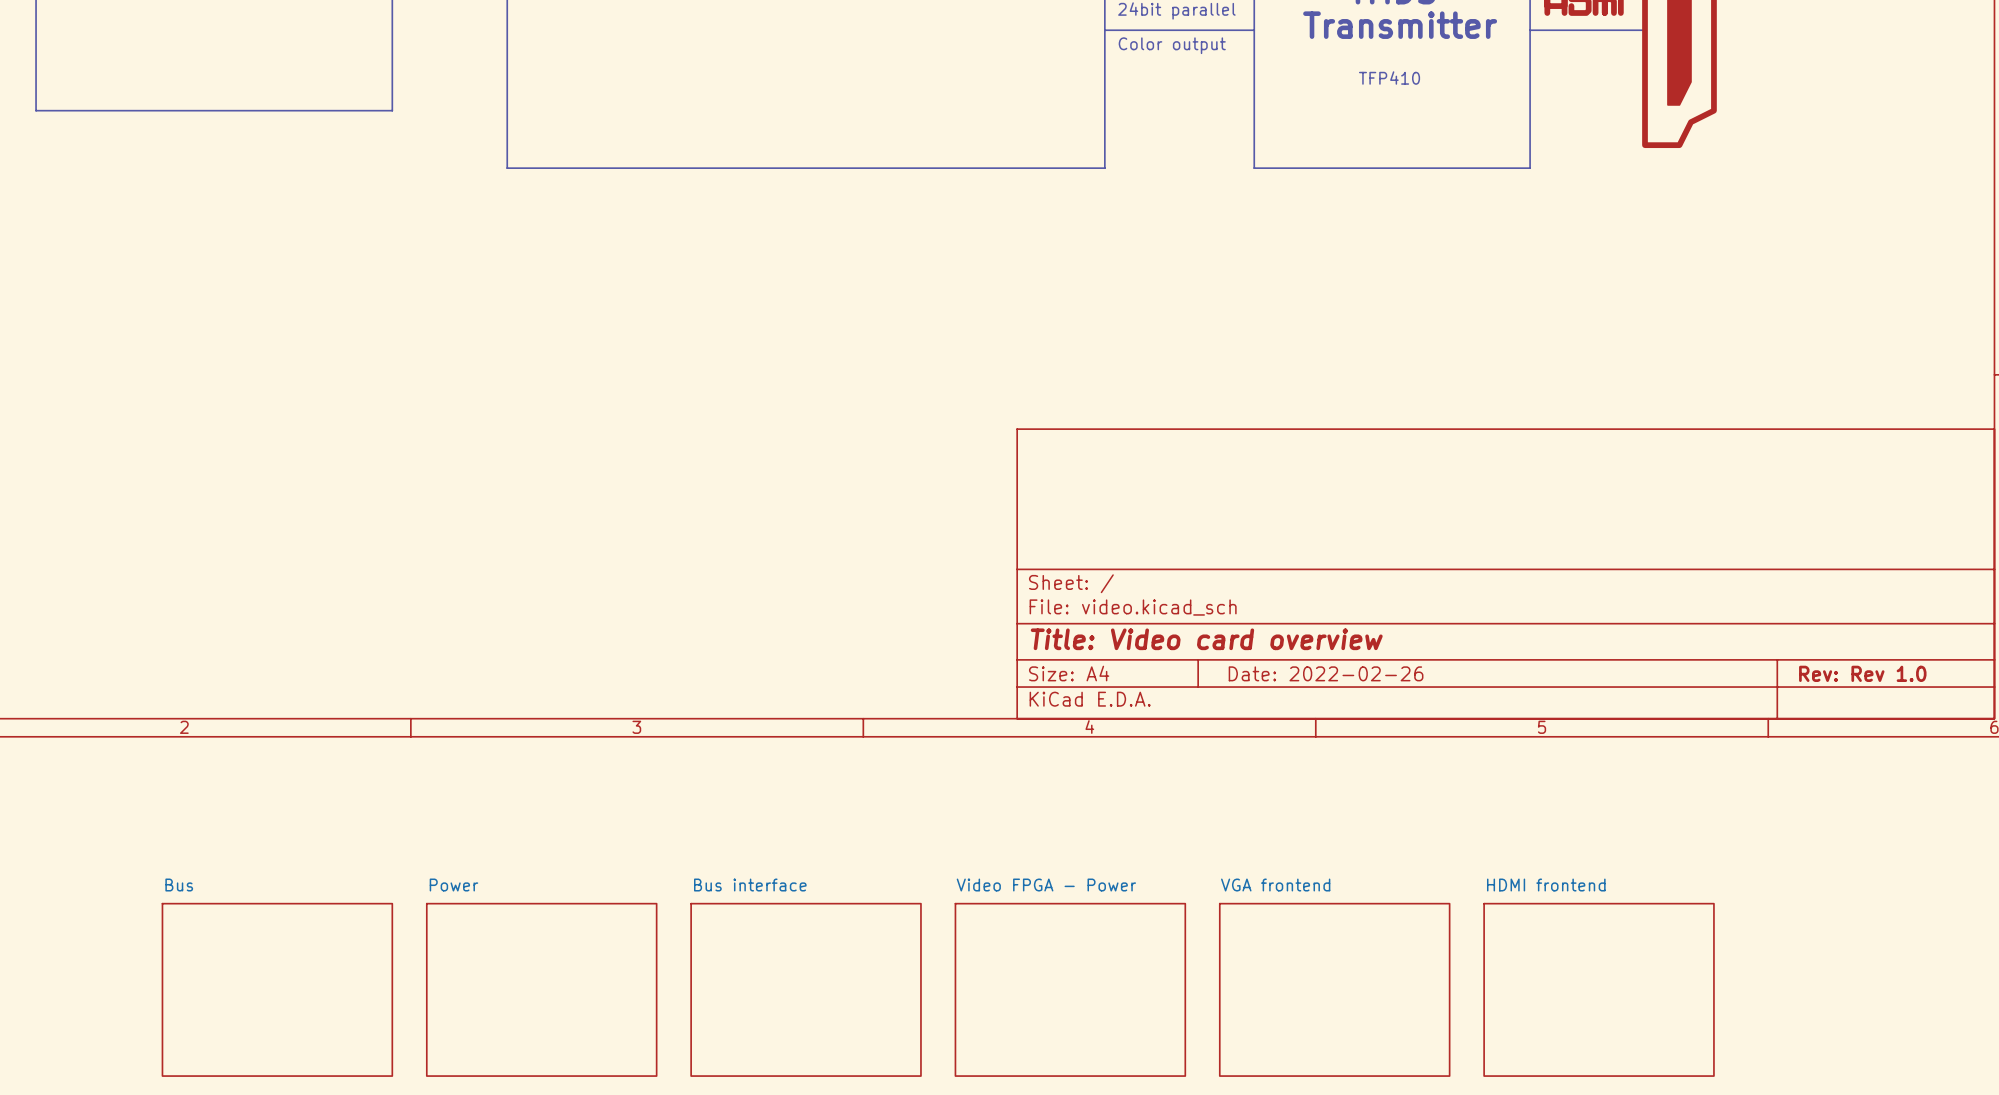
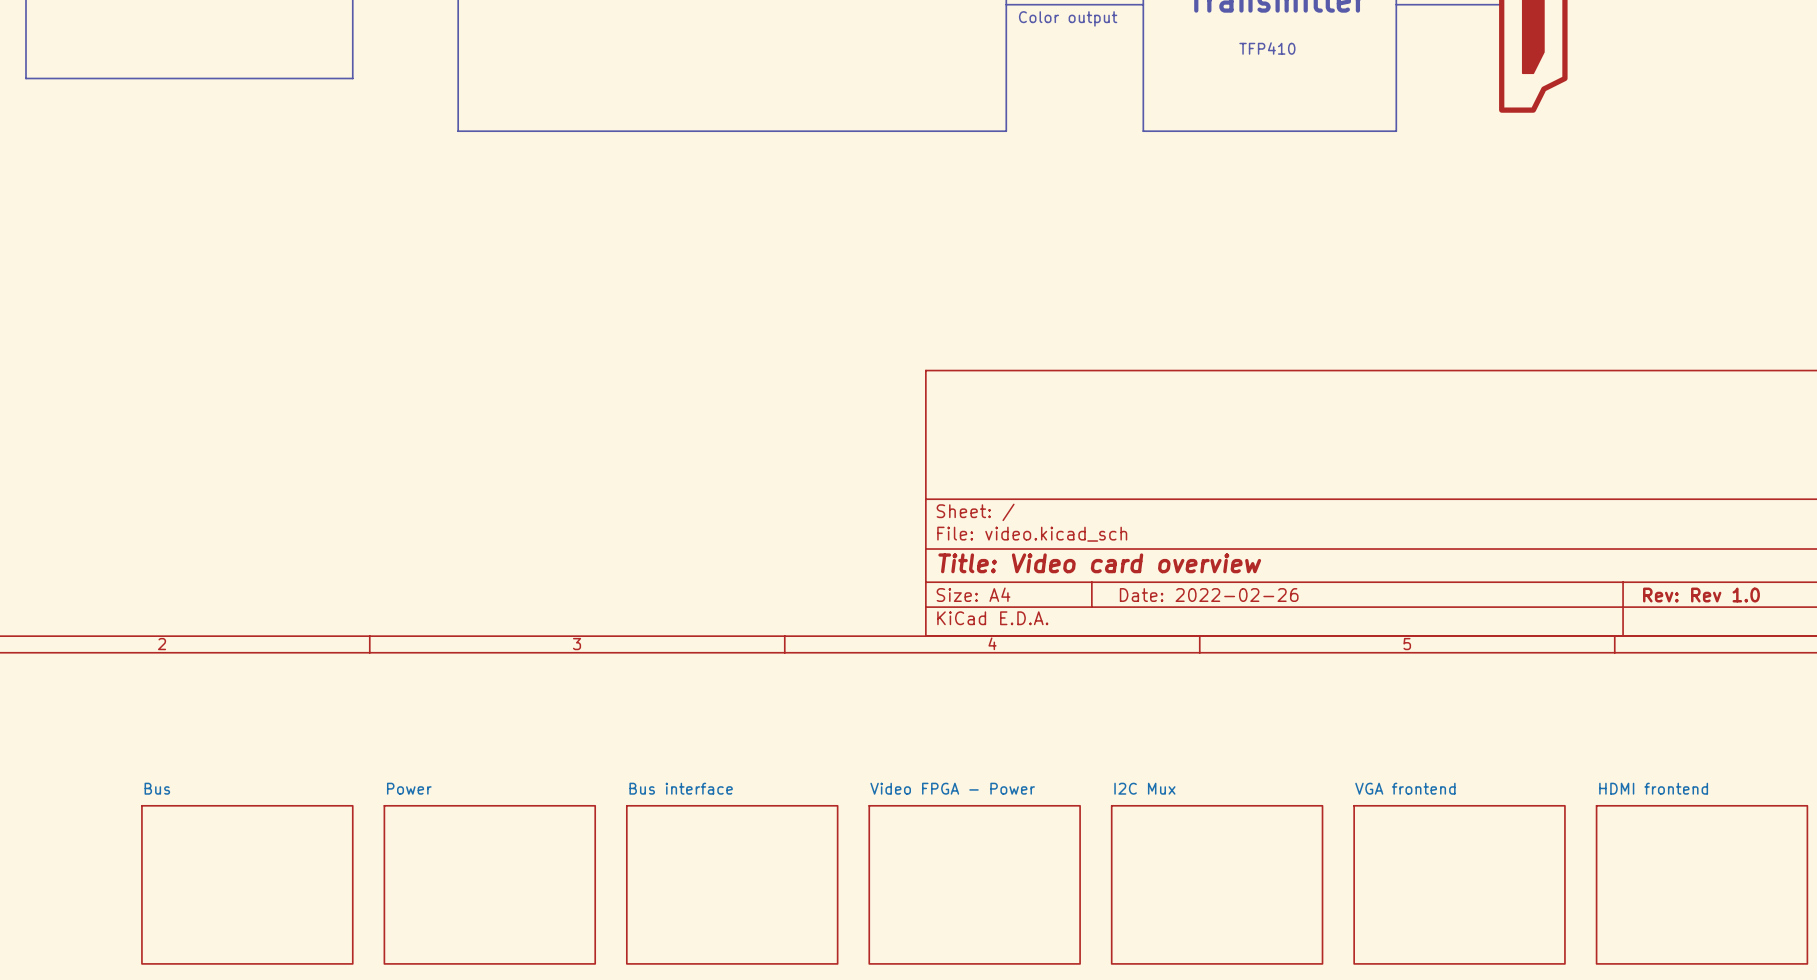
sheet VGA frontend name: VGA frontend (1275, 885) -> I2C Mux (1144, 788)
sheet HDMI frontend name: HDMI frontend (1546, 885) -> VGA frontend (1405, 788)
sheet HDMI frontend: none -> (1701, 884)

